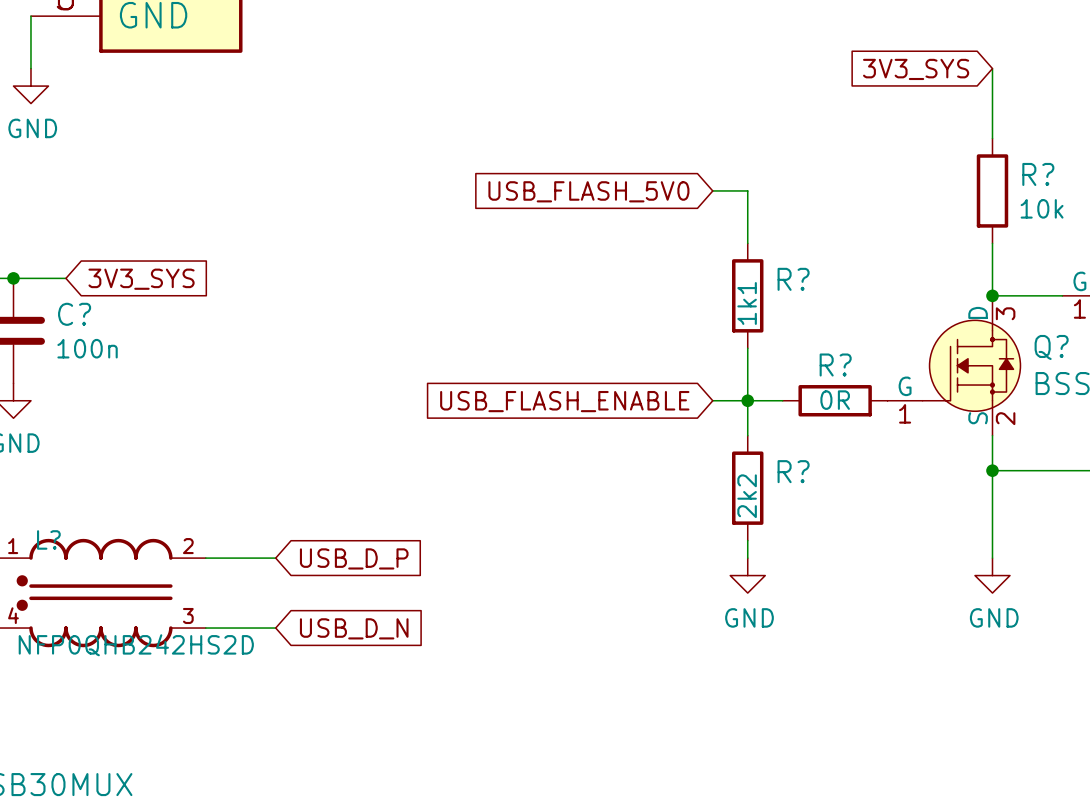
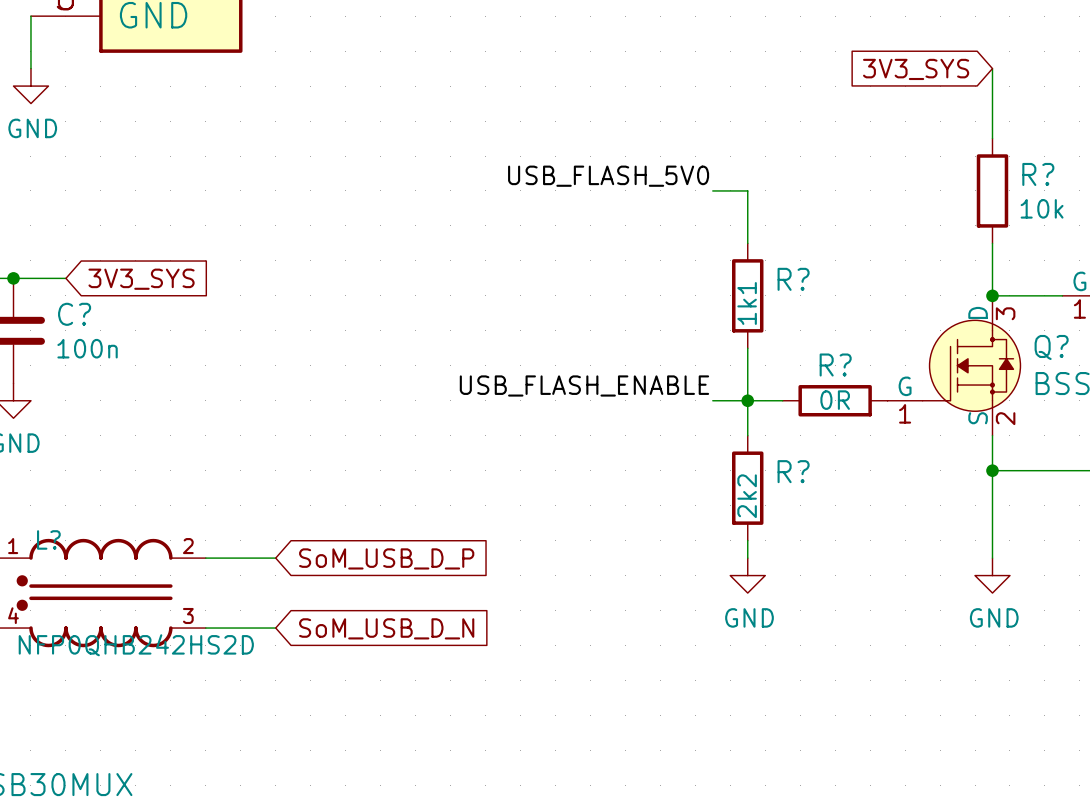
label: none -> USB_FLASH_5V0 (608, 176)
global label: USB_FLASH_5V0 (588, 191) -> none
label: none -> USB_FLASH_ENABLE (584, 385)
global label: USB_FLASH_ENABLE (564, 401) -> none
global label: USB_D_P (354, 558) -> SoM_USB_D_P (386, 558)
global label: USB_D_N (354, 628) -> SoM_USB_D_N (386, 628)

